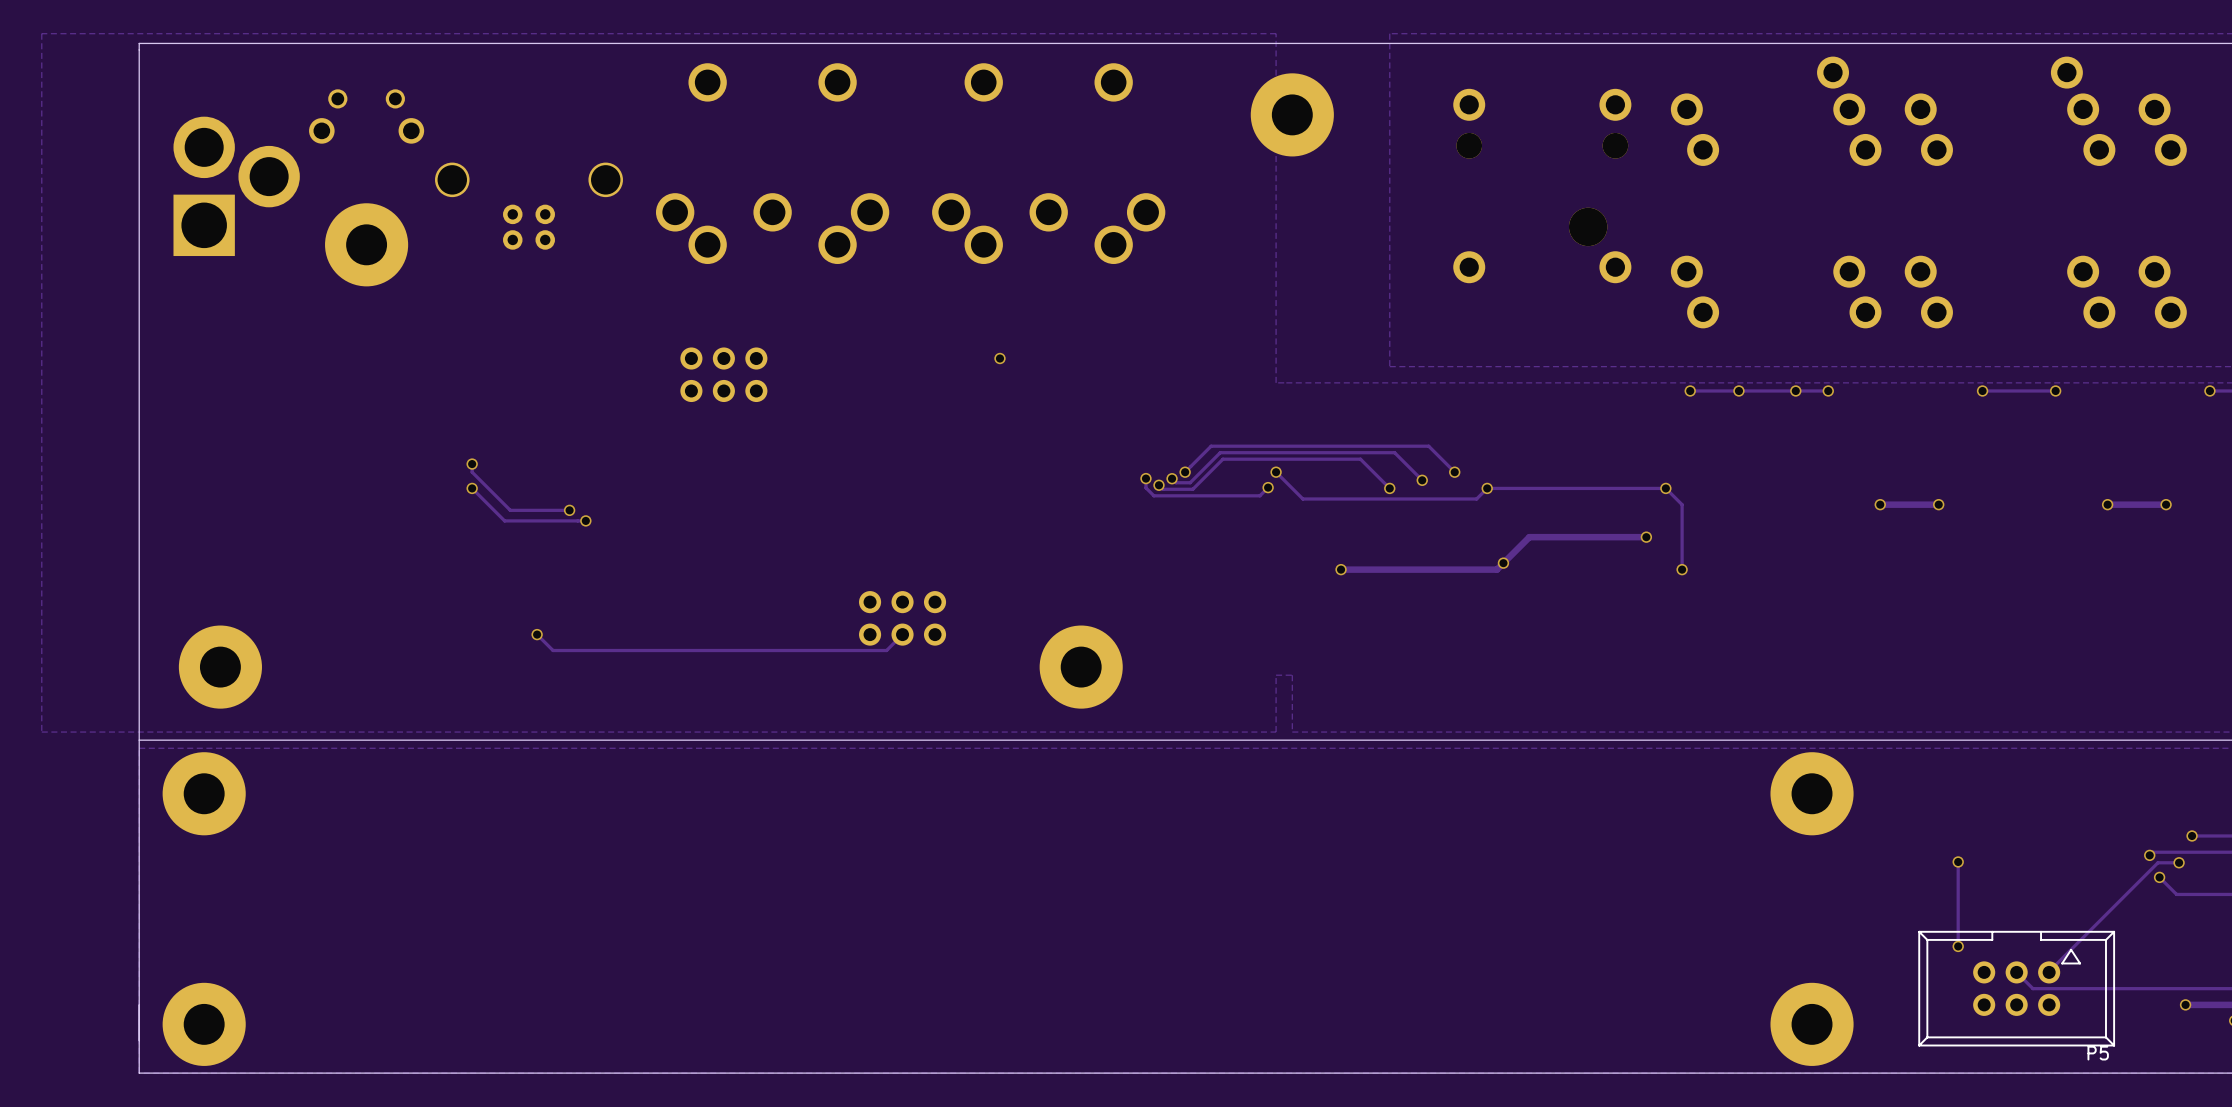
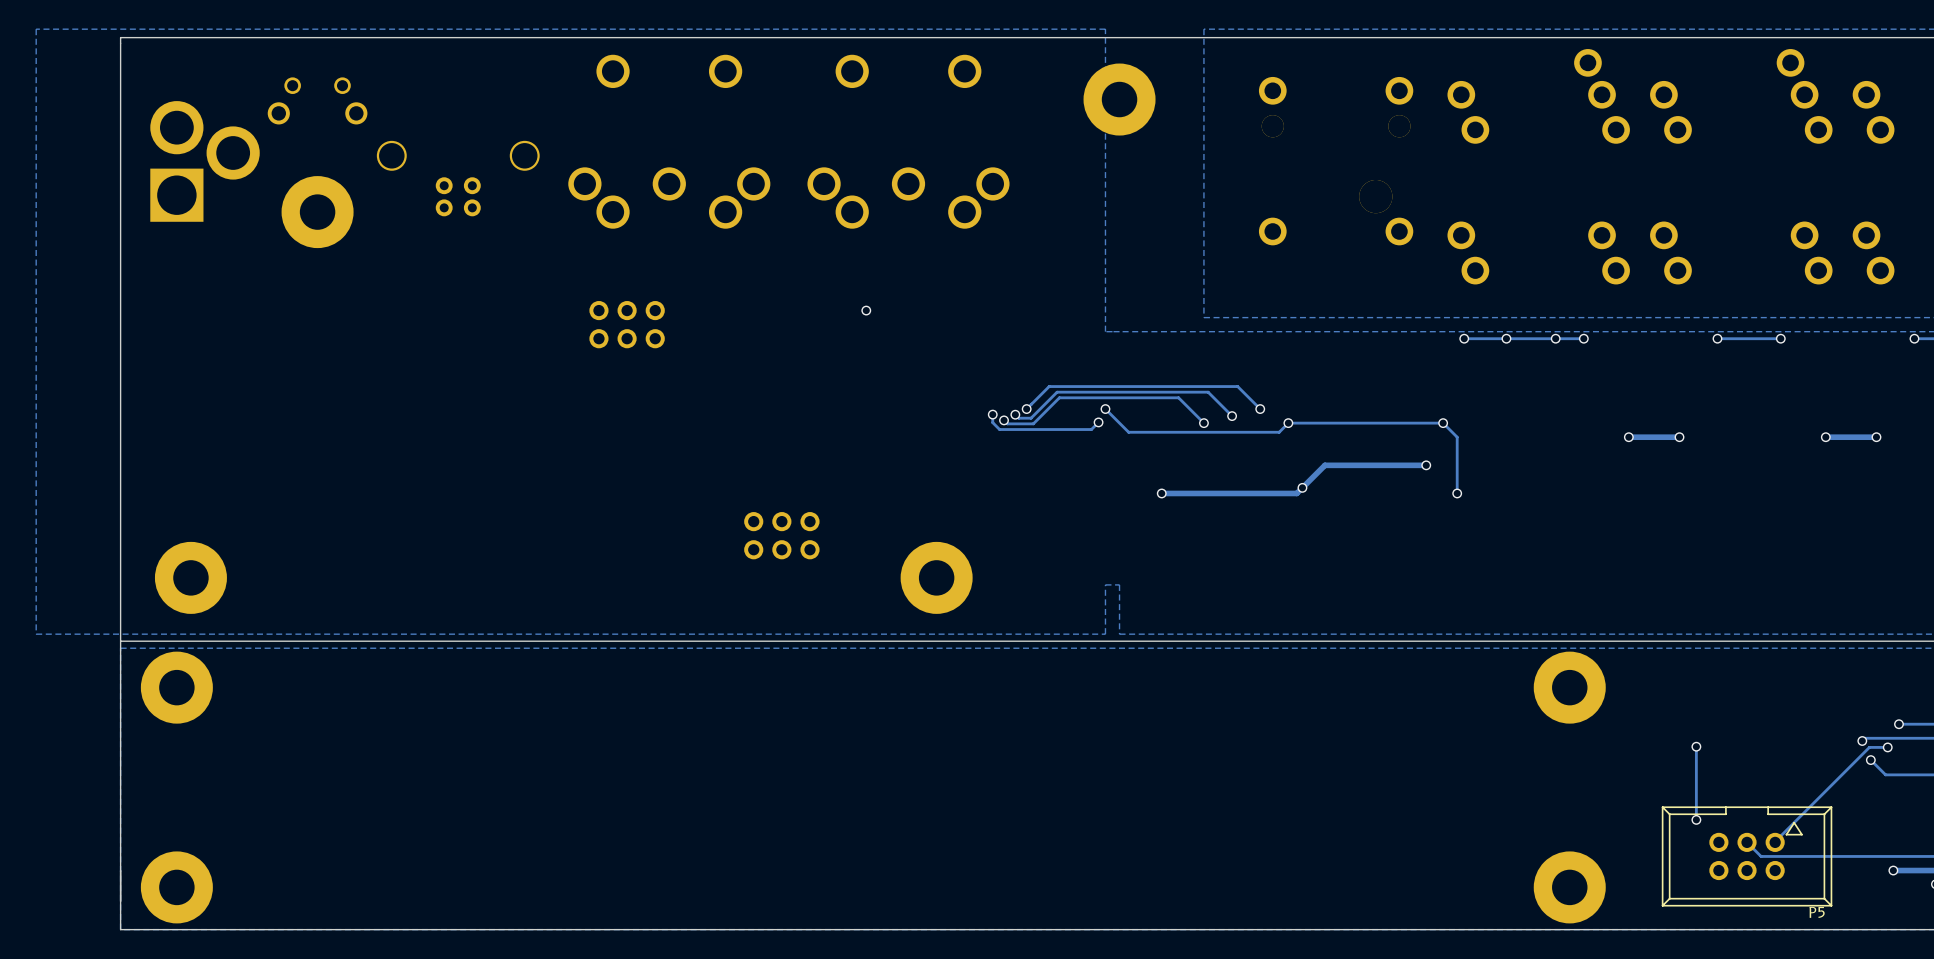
track: (472, 464) (472, 472) (510, 510) (569, 510) -> none
via: (472, 464) -> none
track: (472, 488) (504, 520) (585, 520) -> none
via: (472, 488) -> none
via: (569, 510) -> none
via: (585, 520) -> none
via: (537, 634) -> none
track: (902, 634) (886, 650) (553, 650) (537, 634) -> none

